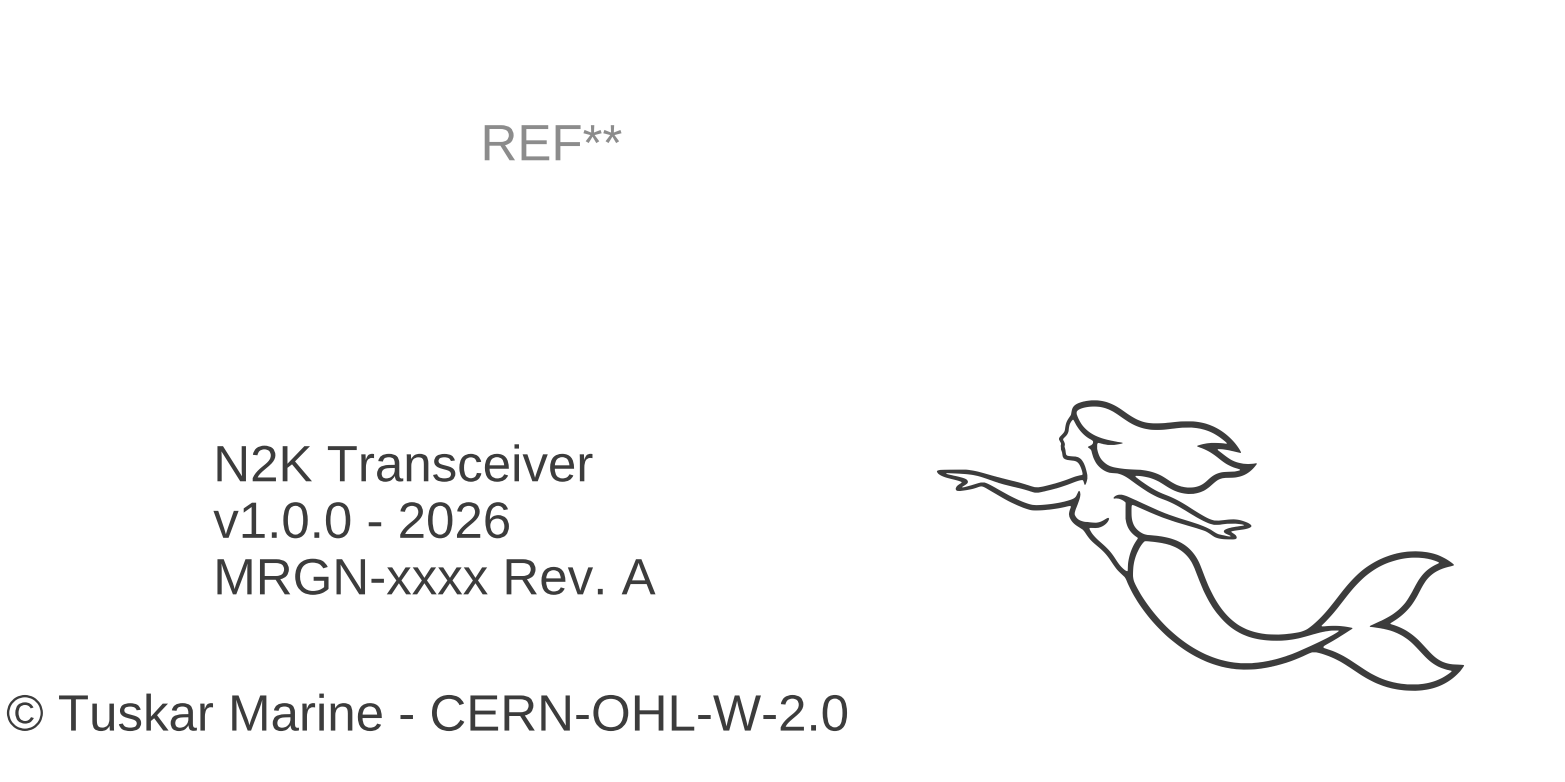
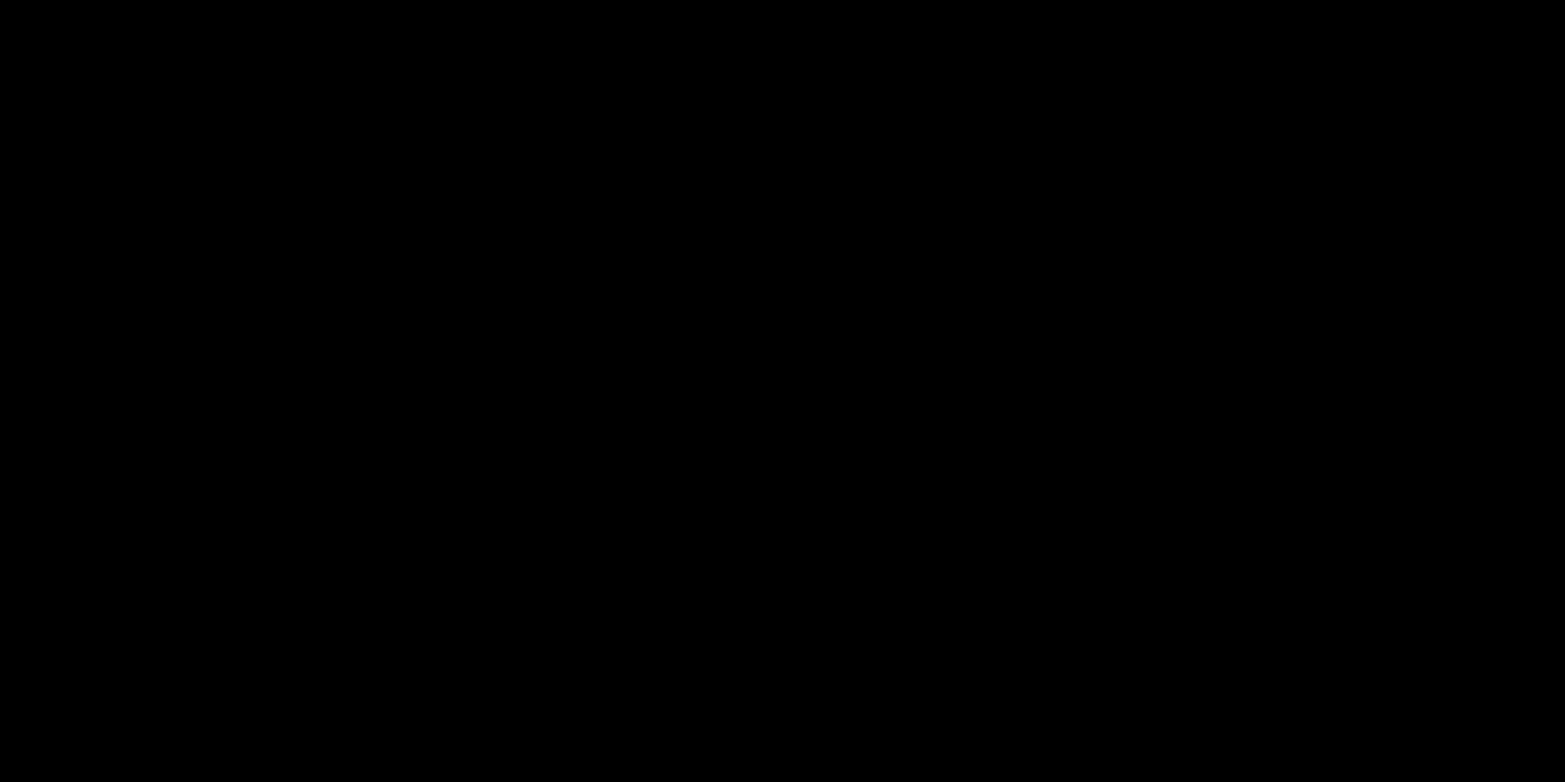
text: N2K Transceiver (404, 463) -> none
text: v1.0.0 - 2026 (361, 520) -> none
REF**: (1200, 545) -> none
text: MRGN-xxxx Rev. A (436, 576) -> none
text: © Tuskar Marine - CERN-OHL-W-2.0 (426, 712) -> none

